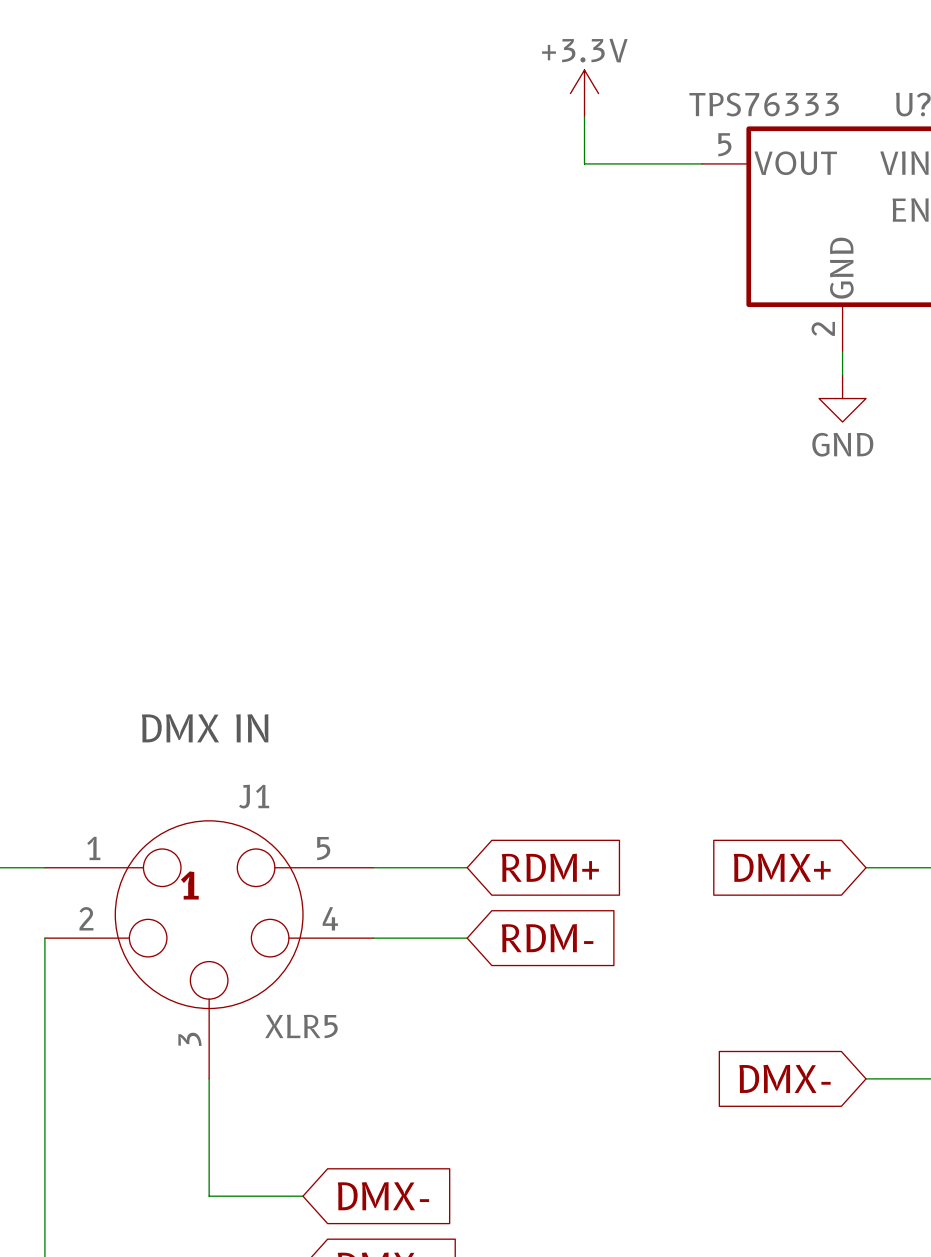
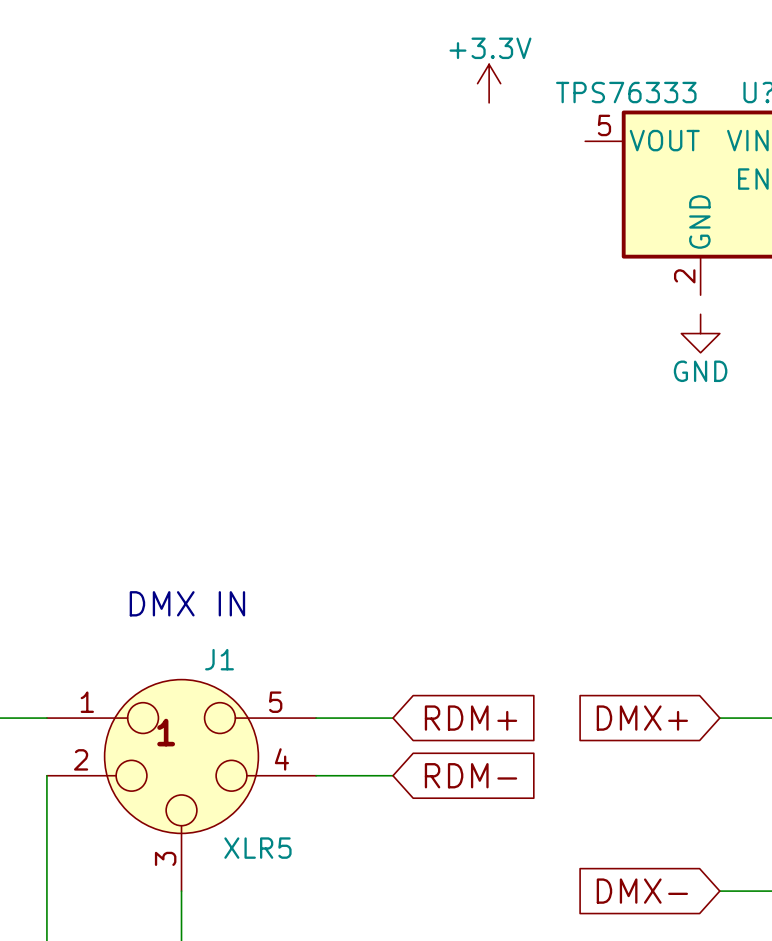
wire: (584, 117) (584, 163) (701, 163) -> none
wire: (842, 351) (842, 375) -> none

